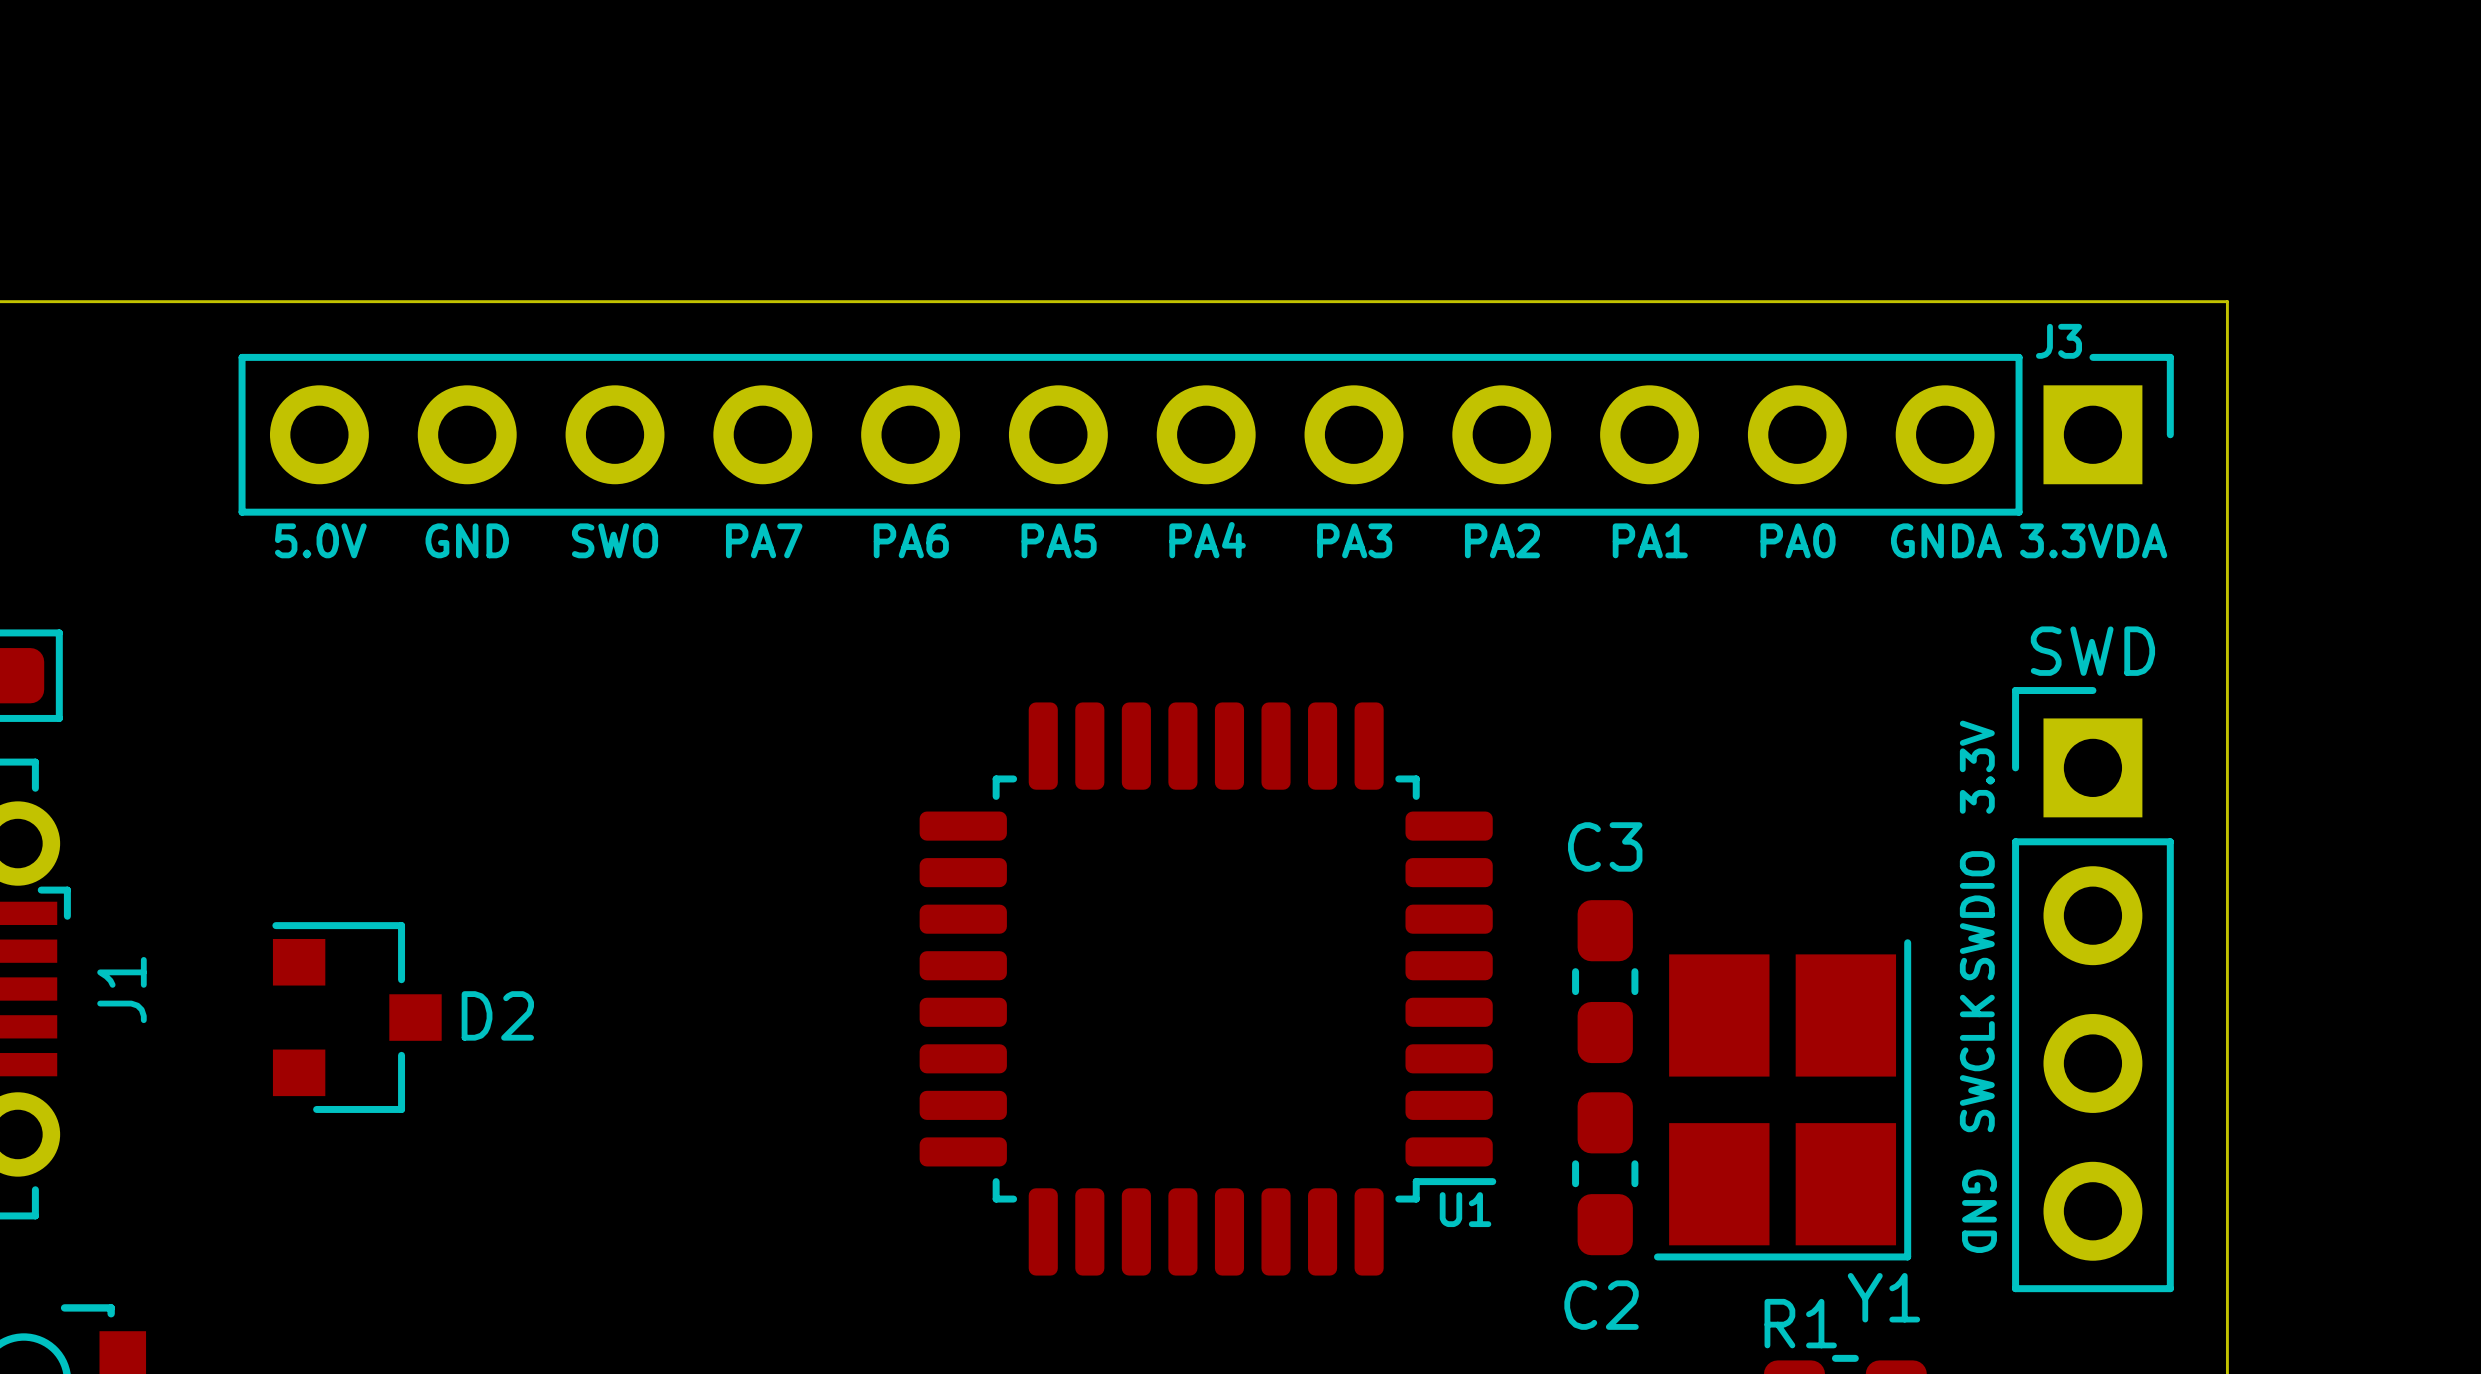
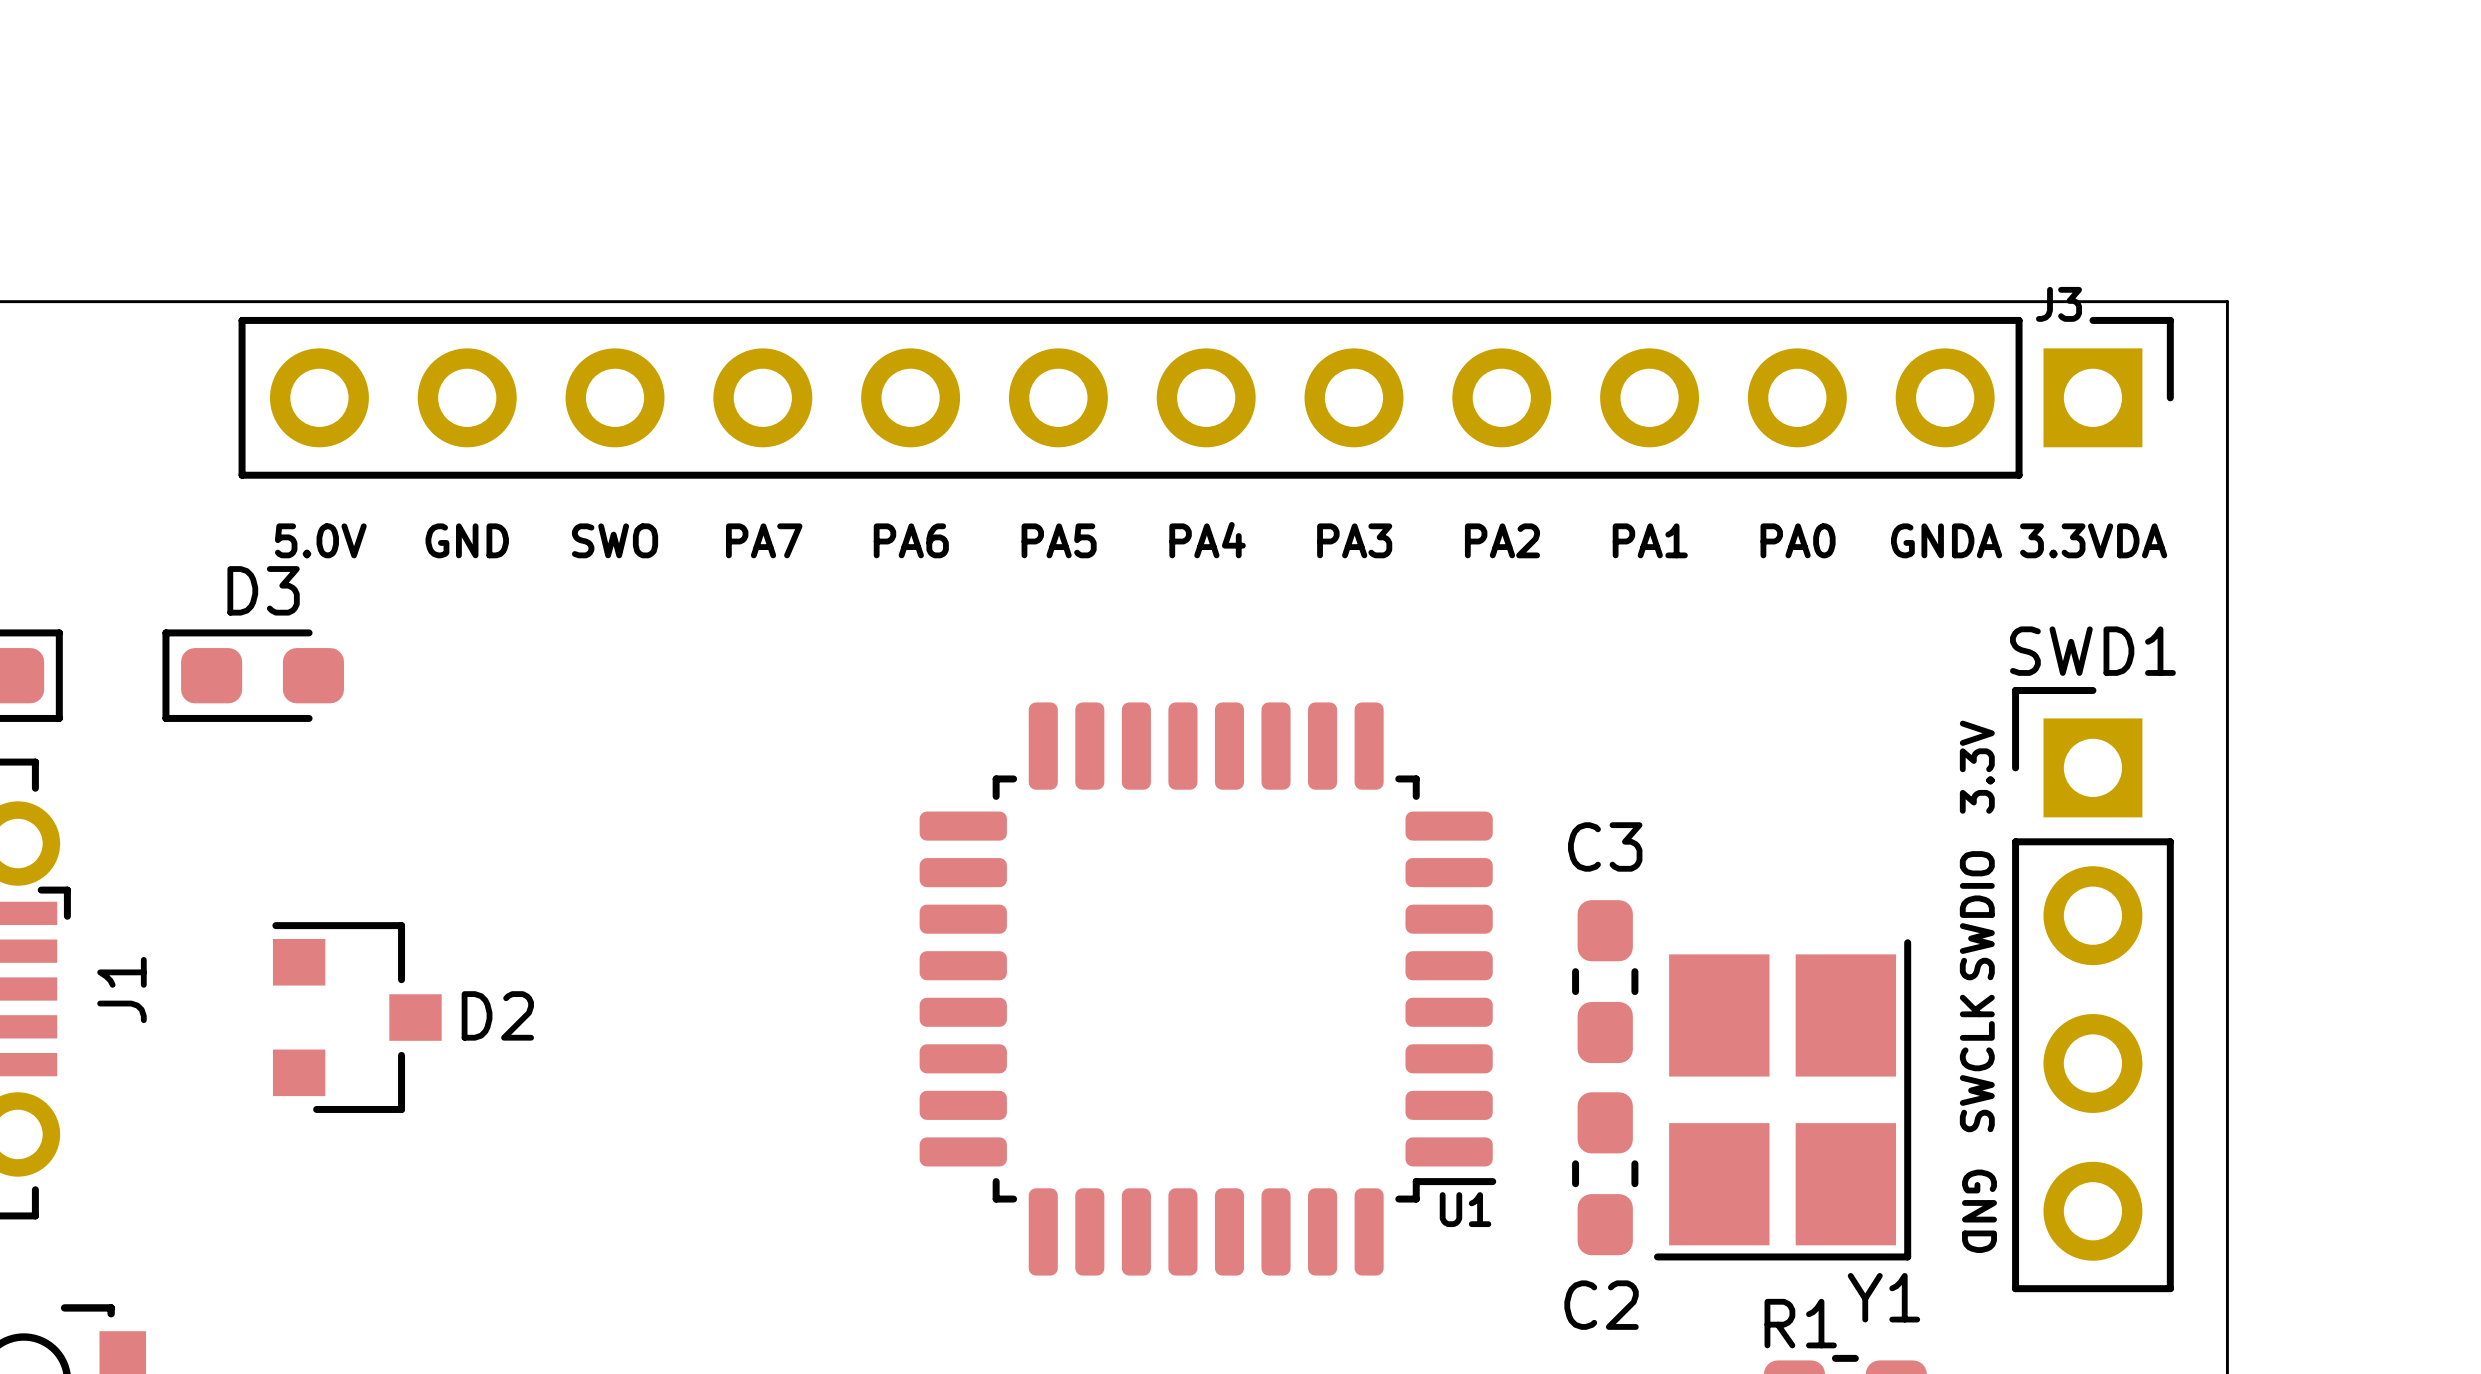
J3 position: (1206, 434) -> (1206, 397)
SWD name: SWD (2092, 651) -> SWD1 (2092, 651)
D3: none -> (253, 675)

